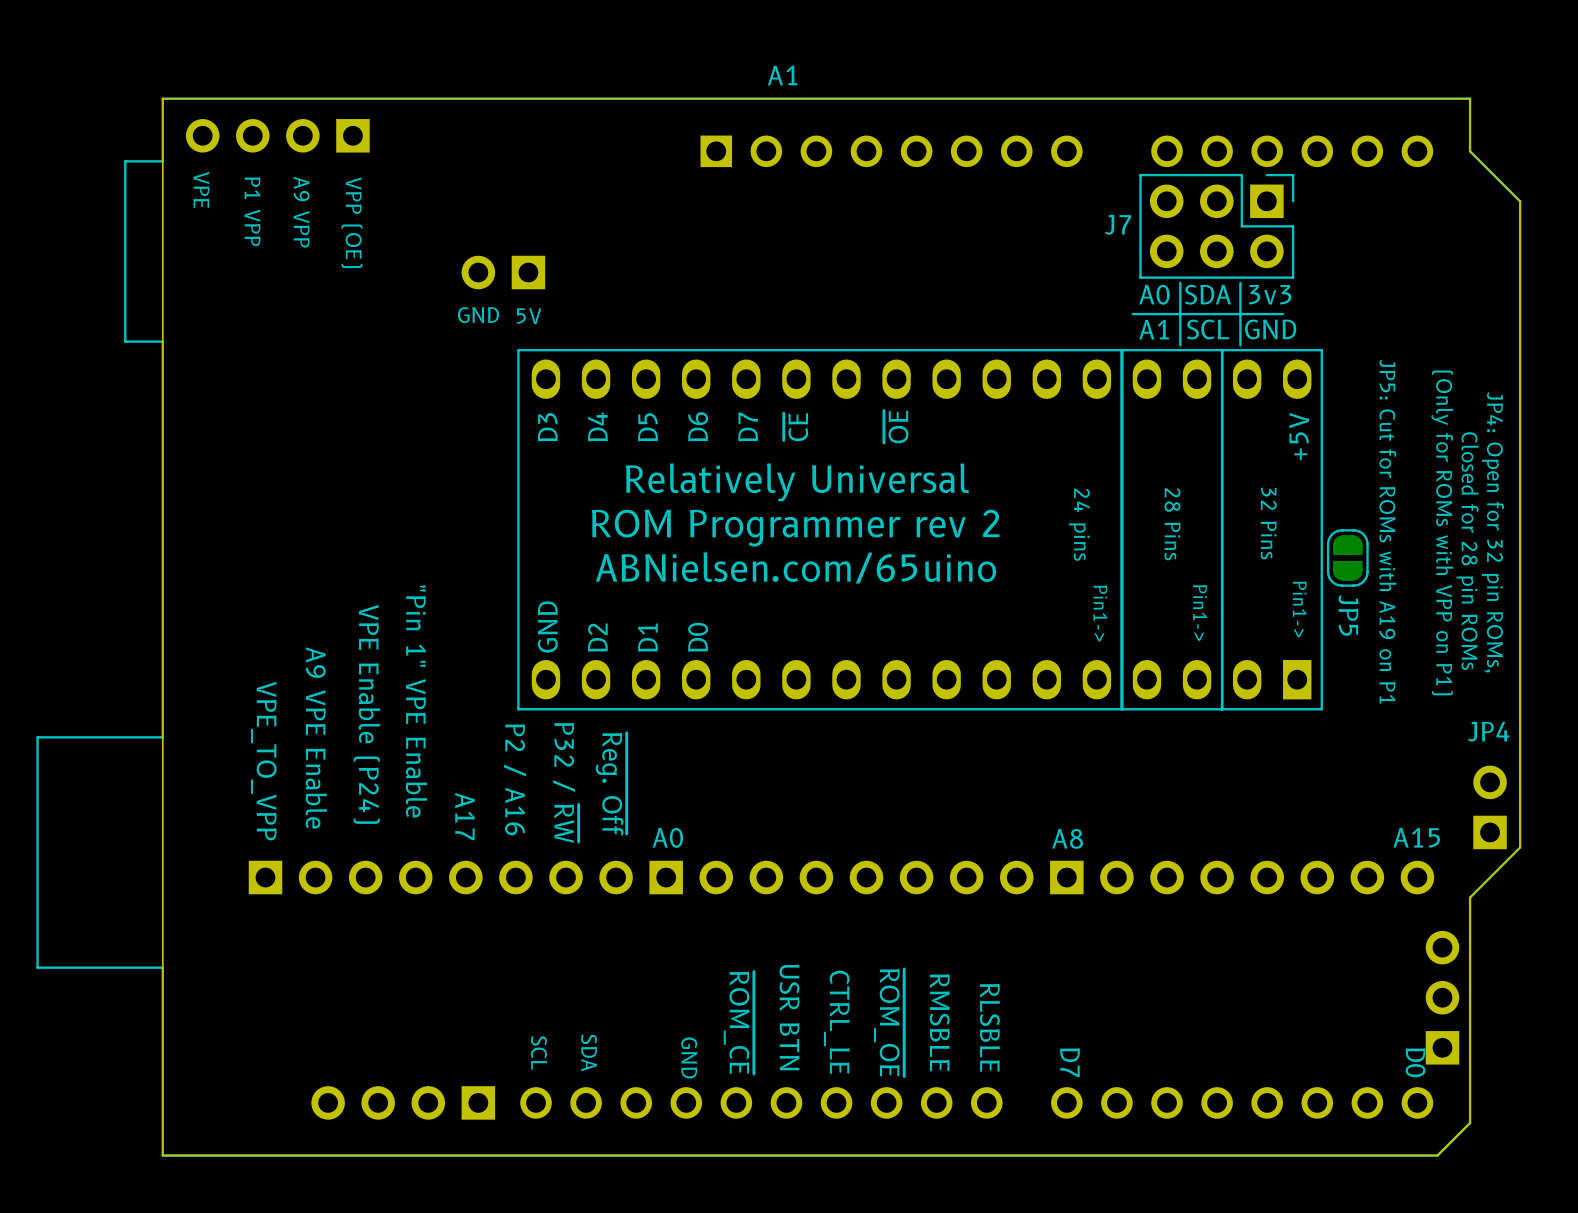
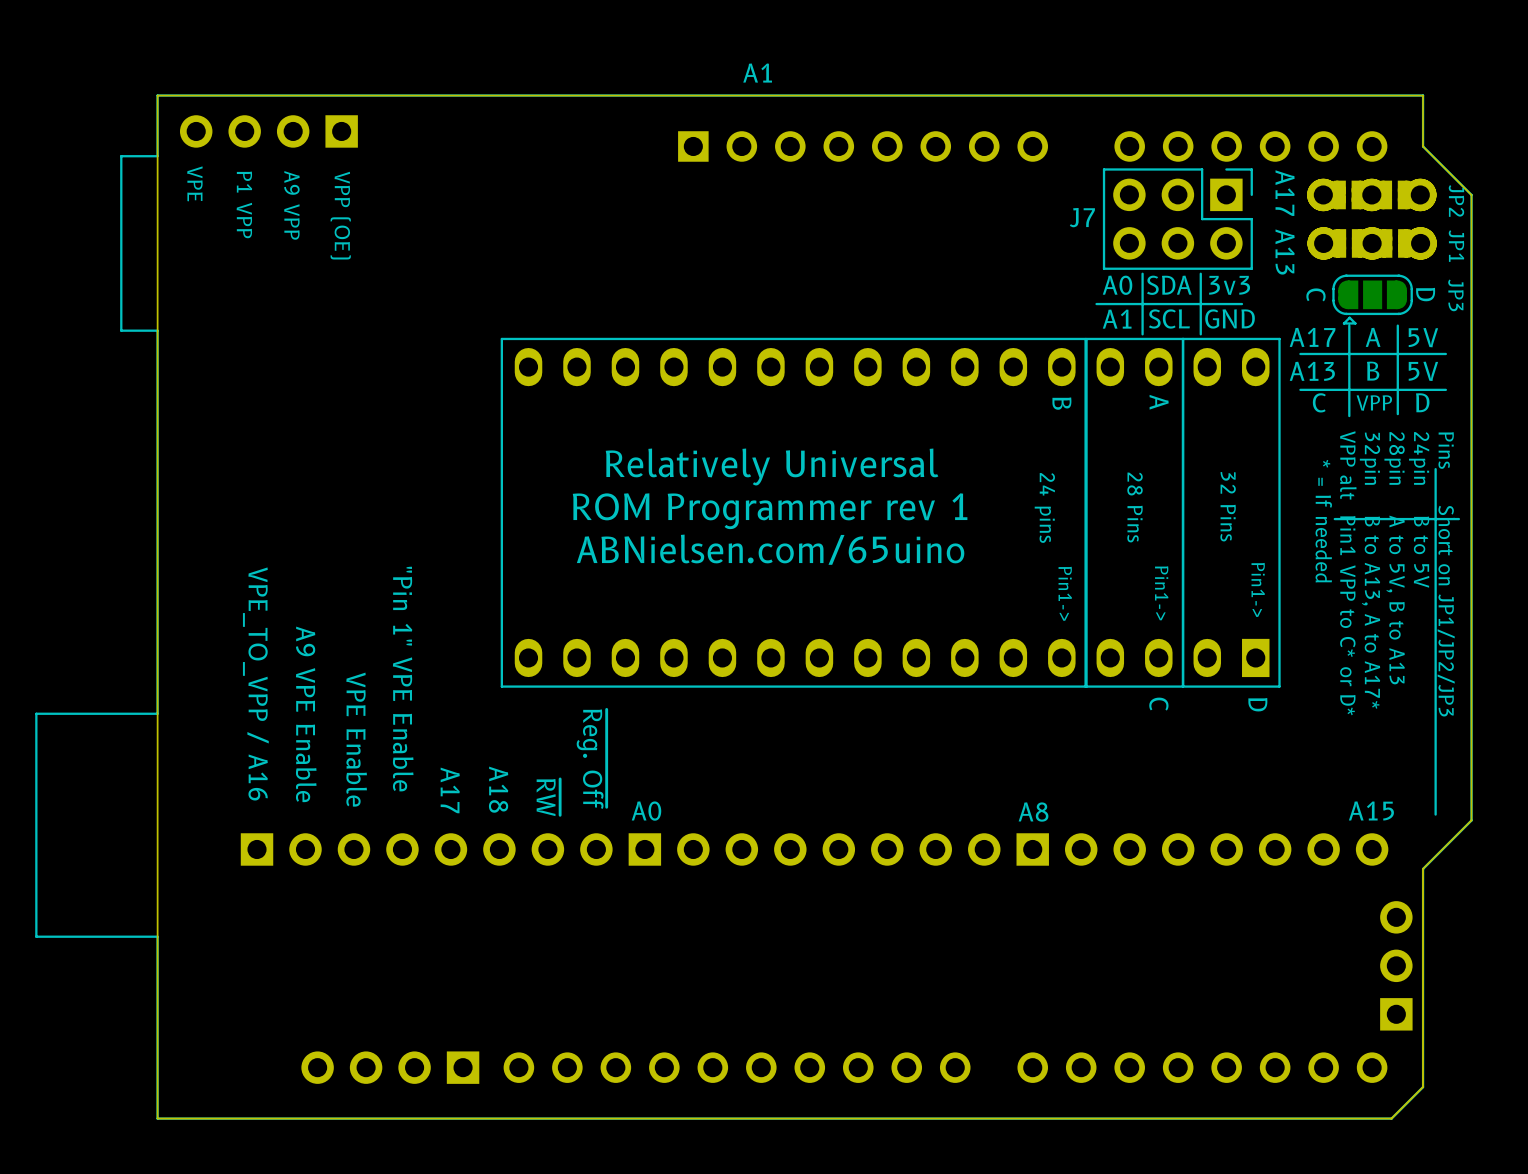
text: none -> A17 (1285, 193)
JP2: none -> (1371, 194)
JP1: none -> (1372, 243)
text: none -> A13 (1285, 252)
part: (503, 272) -> none
text: none -> C (1315, 294)
text: none -> D (1425, 294)
JP3: none -> (1372, 299)
text: GND (478, 315) -> none
text: 5V (529, 316) -> none
line: none -> (1349, 325) (1349, 416)
line: none -> (1397, 325) (1397, 414)
text: none -> A17 (1312, 337)
text: none -> A (1373, 337)
text: none -> 5V (1423, 337)
line: none -> (1445, 353) (1300, 353)
text: none -> A13 (1312, 371)
text: none -> B (1373, 371)
text: none -> 5V (1423, 371)
line: none -> (1445, 389) (1300, 389)
text: none -> A (1159, 402)
text: none -> B (1061, 403)
text: none -> C (1319, 402)
text: none -> VPP (1374, 402)
text: none -> D (1422, 402)
text: D4 (597, 426) -> none
text: D6 (698, 426) -> none
text: D7 (748, 426) -> none
text: ~{OE} (896, 426) -> none
text: D3 (547, 427) -> none
text: D5 (647, 427) -> none
text: ~{CE} (796, 427) -> none
text: +5V (1299, 436) -> none
line: none -> (1435, 469) (1435, 814)
text: none -> 24pin B to 5V (1419, 509)
text: ROM Programmer rev 2 (795, 528) -> ROM Programmer rev 1 (770, 511)
text: JP5: Cut for ROMs with A19 on P1 (1387, 531) -> none
text: (Only for ROMs with VPP on P1) (1442, 532) -> none
text: JP4: Open for 32 pin ROMs, (1492, 532) -> none
line: none -> (1458, 519) (1334, 519)
text: none -> * = If needed (1323, 521)
text: Closed for 28 pin ROMs (1467, 551) -> none
JP5: (1347, 558) -> none
text: none -> 28pin A to 5V, B to A13 (1394, 558)
text: none -> 32pin B to A13, A to A17* (1370, 570)
text: none -> VPP alt Pin1 VPP to C* or D* (1348, 573)
text: none -> Pins Short on JP1/JP2/JP3 (1446, 574)
text: GND (547, 626) -> none
text: D2 (597, 637) -> none
text: D1 (647, 637) -> none
text: D0 (698, 637) -> none
text: VPE Enable (P24) (366, 714) -> VPE Enable (356, 739)
text: none -> C (1158, 704)
text: none -> D (1257, 704)
text: VPE_TO_VPP (263, 761) -> VPE_TO_VPP / A16 (255, 683)
text: P2 / A16 (515, 779) -> none
text: P32 / ~{RW} (565, 782) -> ~{RW} (548, 797)
JP4: (1490, 807) -> none
text: none -> A18 (498, 789)
text: USR BTN (789, 1017) -> none
text: ~{ROM_CE} (738, 1022) -> none
text: CTRL_LE (836, 1022) -> none
text: ~{ROM_OE} (889, 1022) -> none
text: RMSBLE (939, 1022) -> none
text: RLSBLE (989, 1027) -> none
text: SCL (538, 1052) -> none
text: SDA (589, 1052) -> none
text: GND (689, 1057) -> none
text: D7 (1070, 1062) -> none
text: D0 (1415, 1062) -> none

